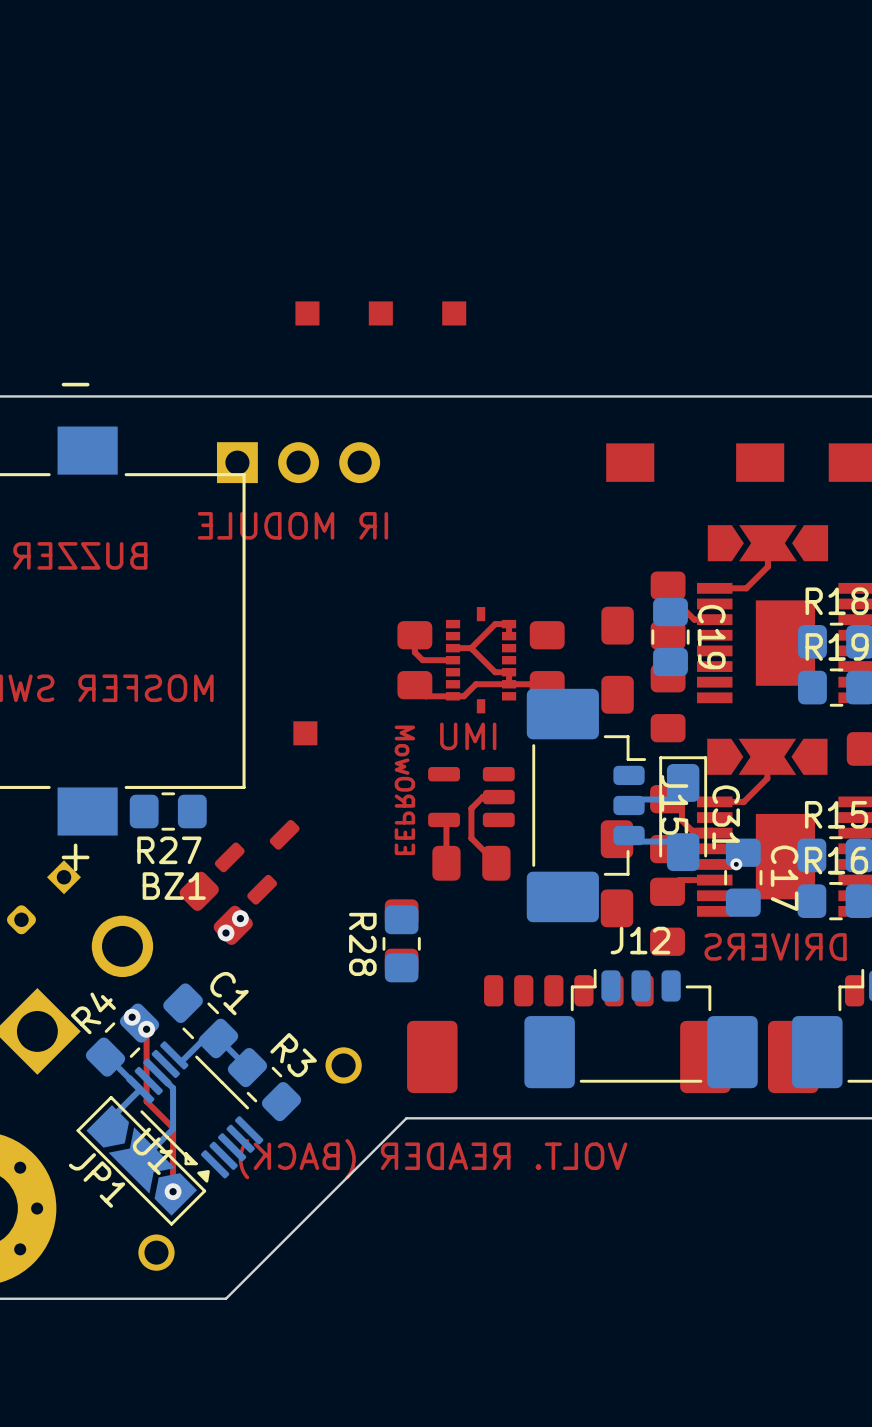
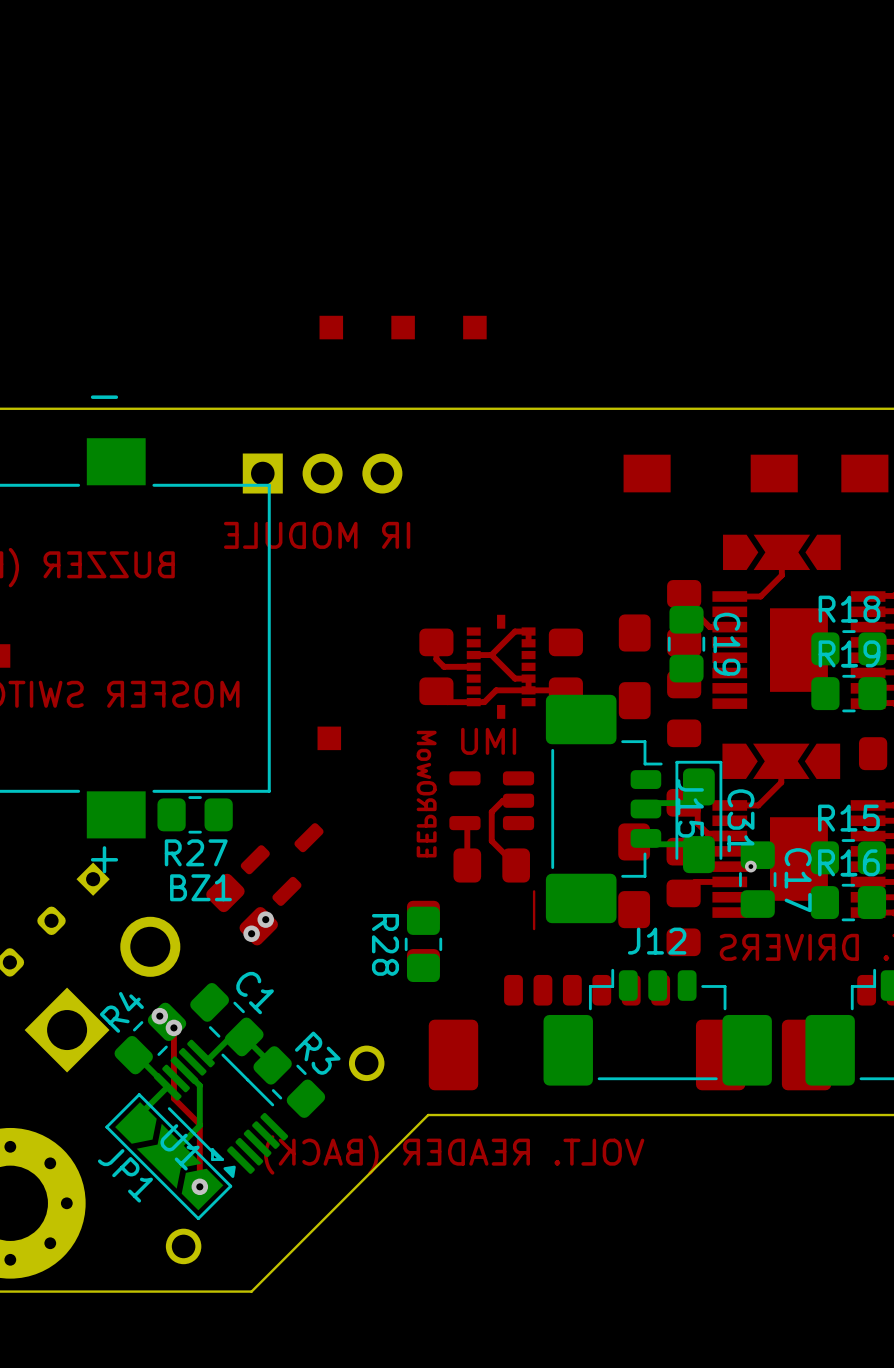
top track: none -> (534, 891) (534, 929)

